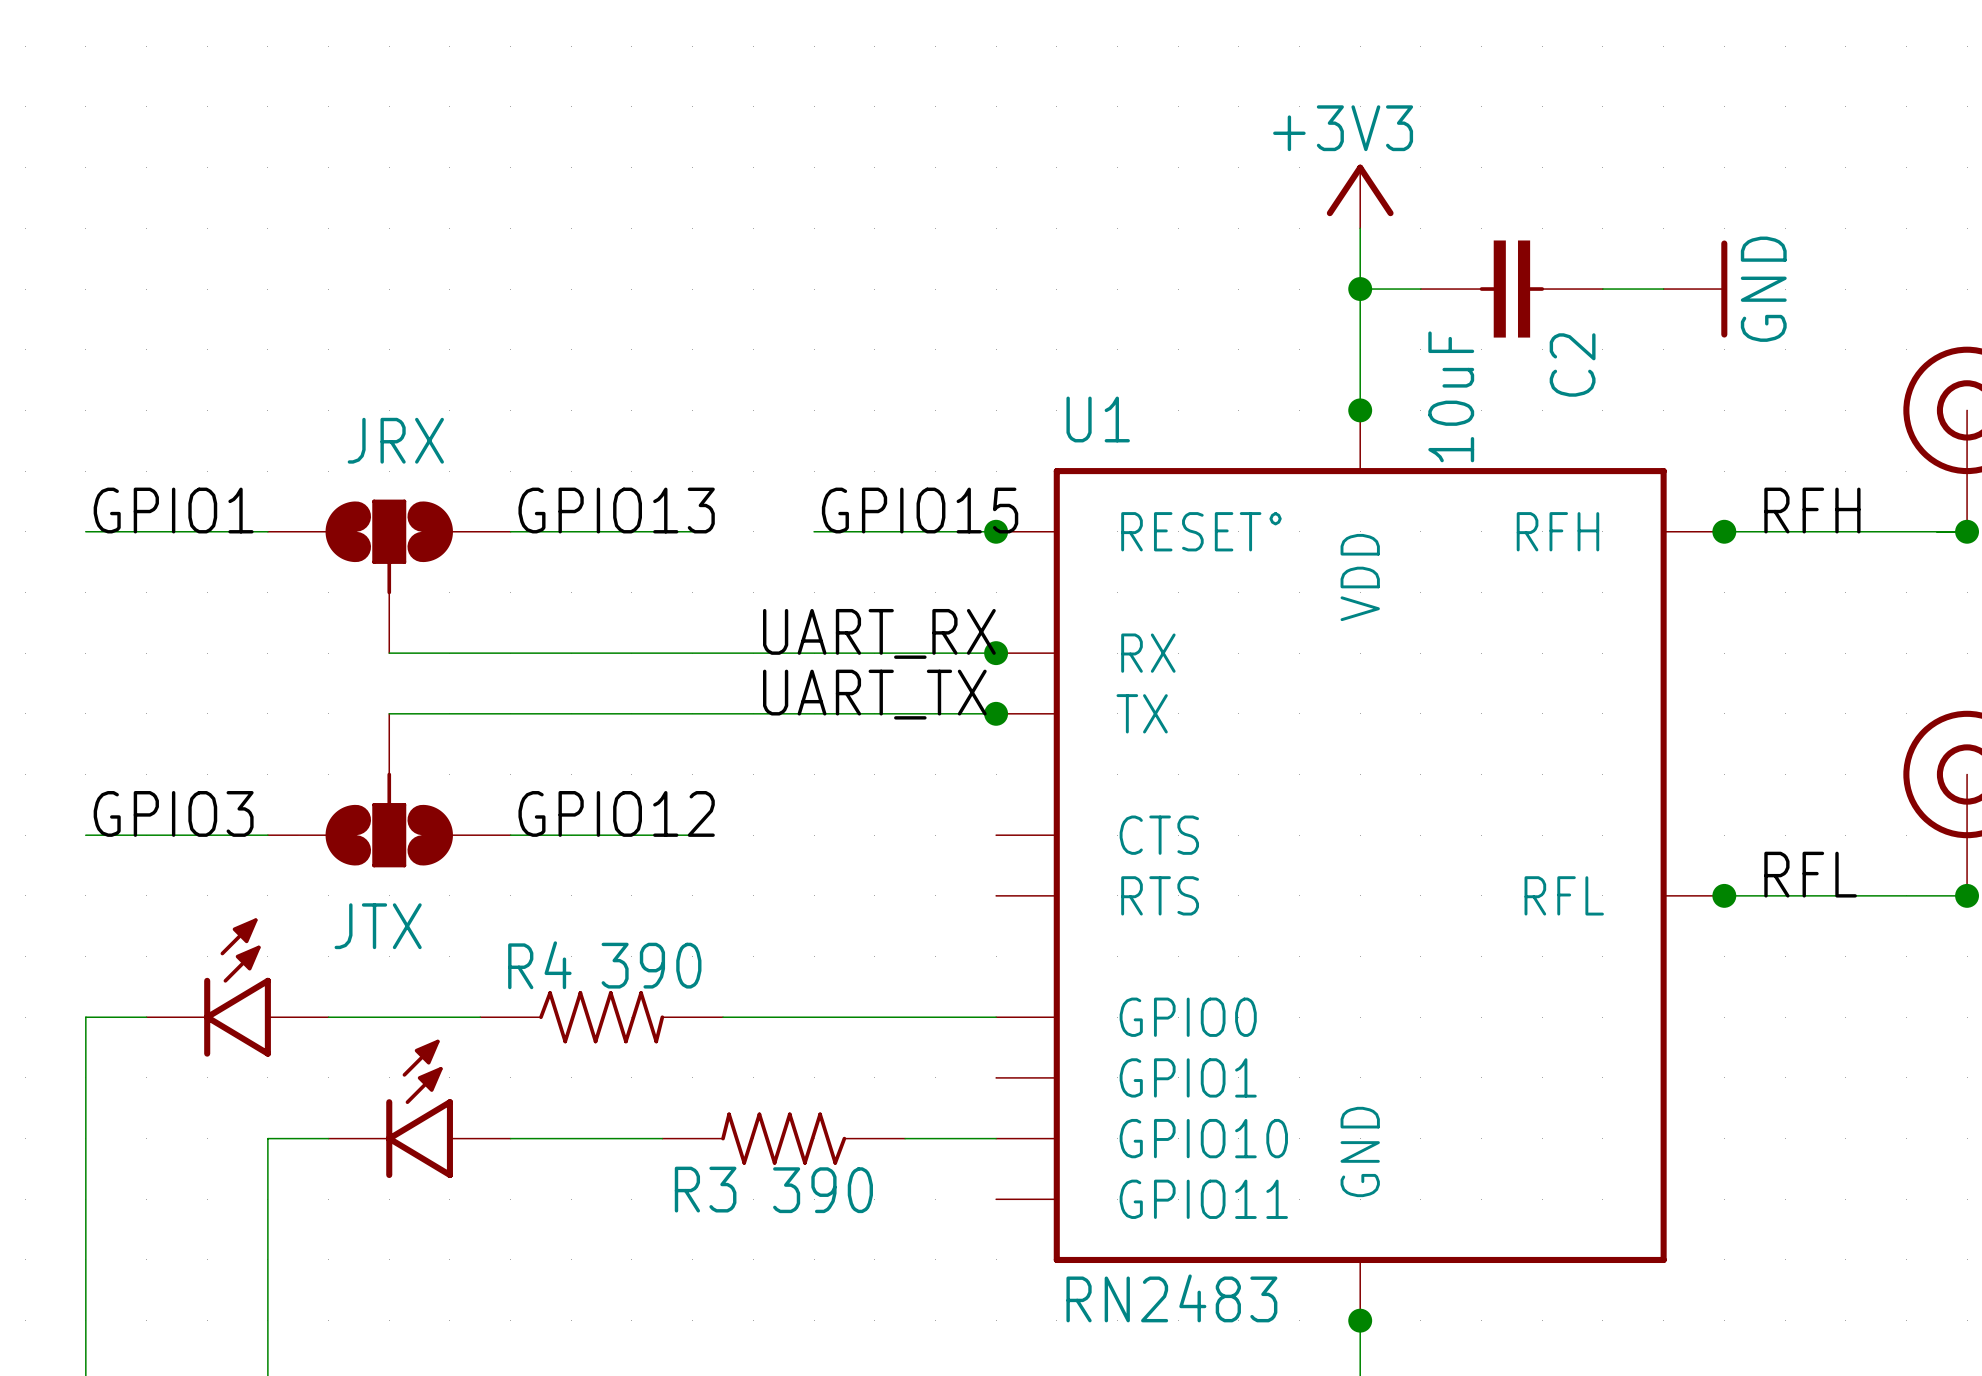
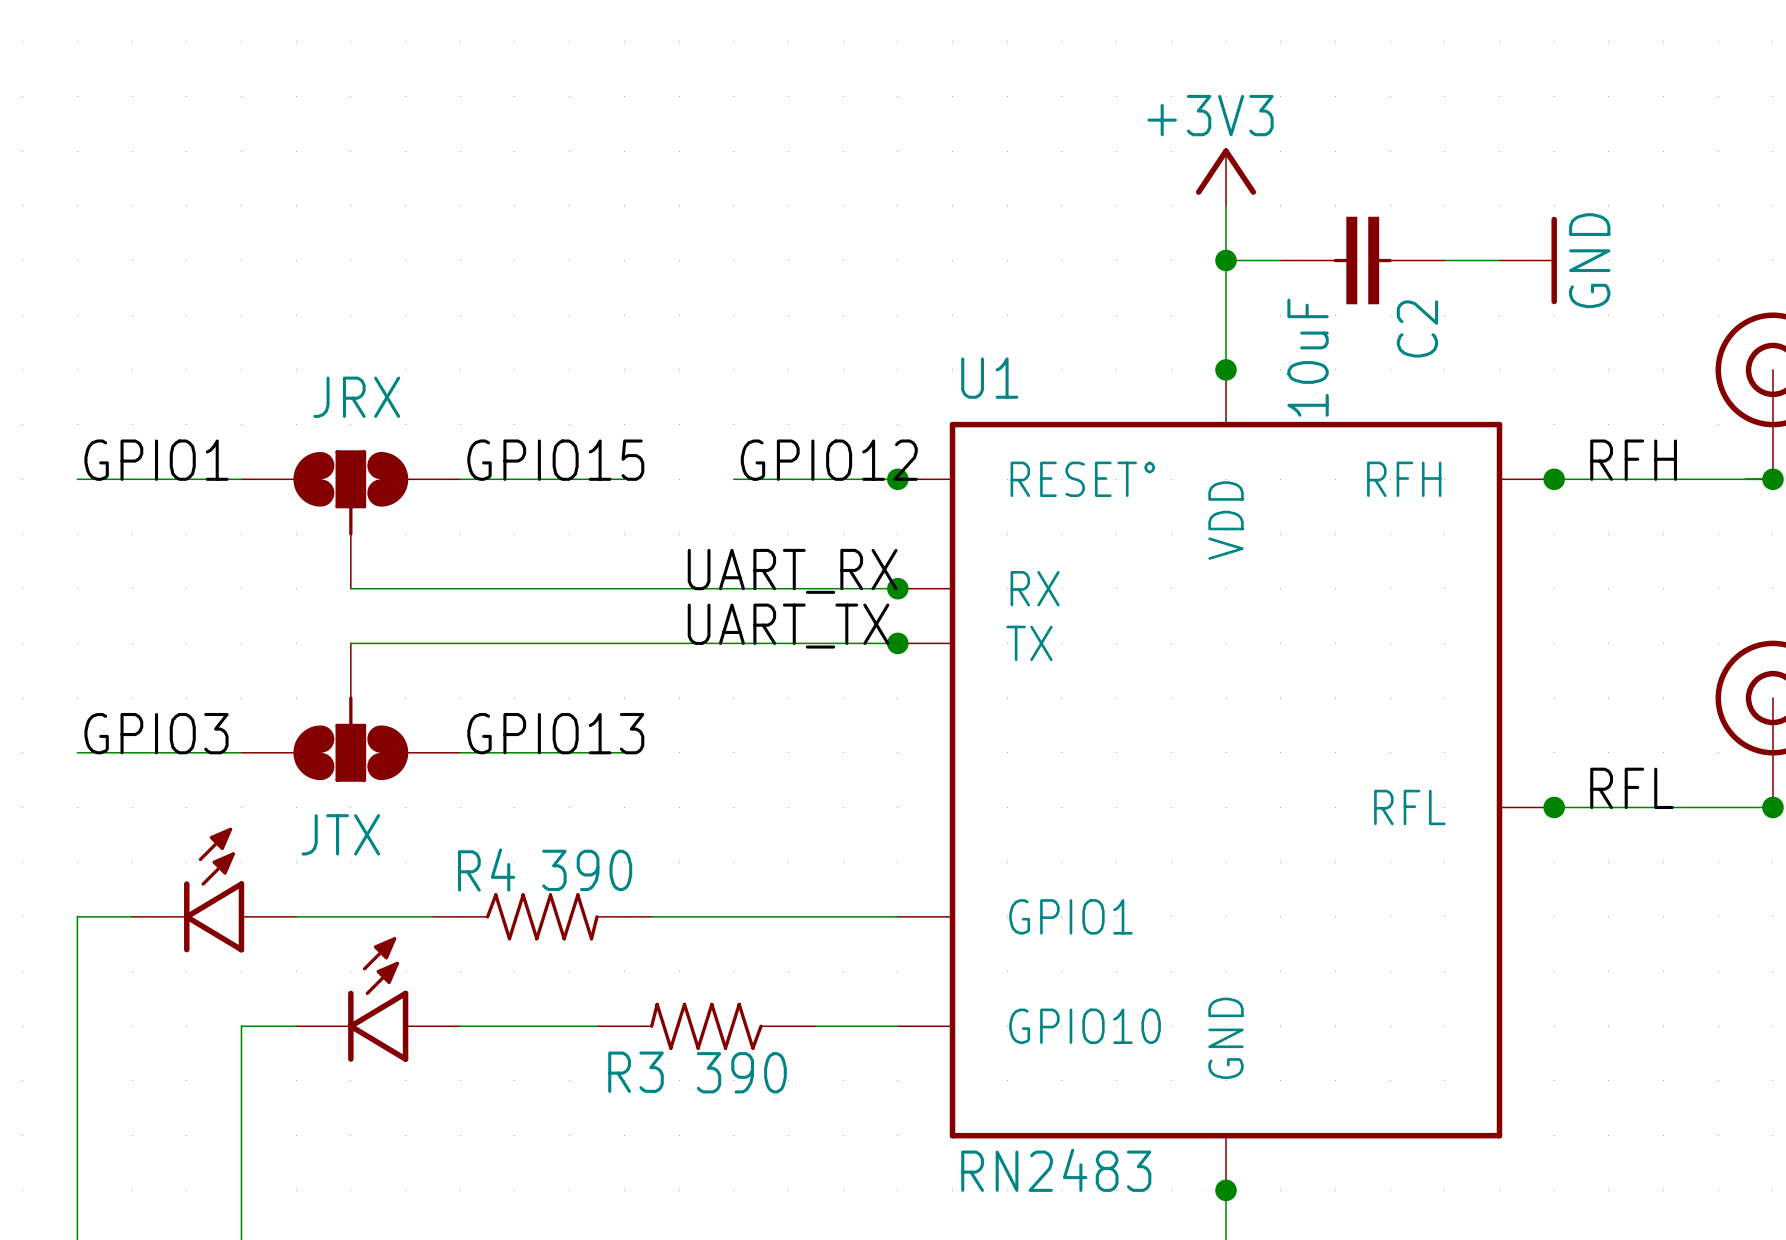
U1 symbol: [996, 410, 1725, 1321] -> [897, 369, 1555, 1191]
label: GPIO13 (616, 510) -> GPIO15 (555, 460)
label: GPIO15 (920, 510) -> GPIO12 (829, 460)
label: GPIO12 (616, 813) -> GPIO13 (555, 733)

